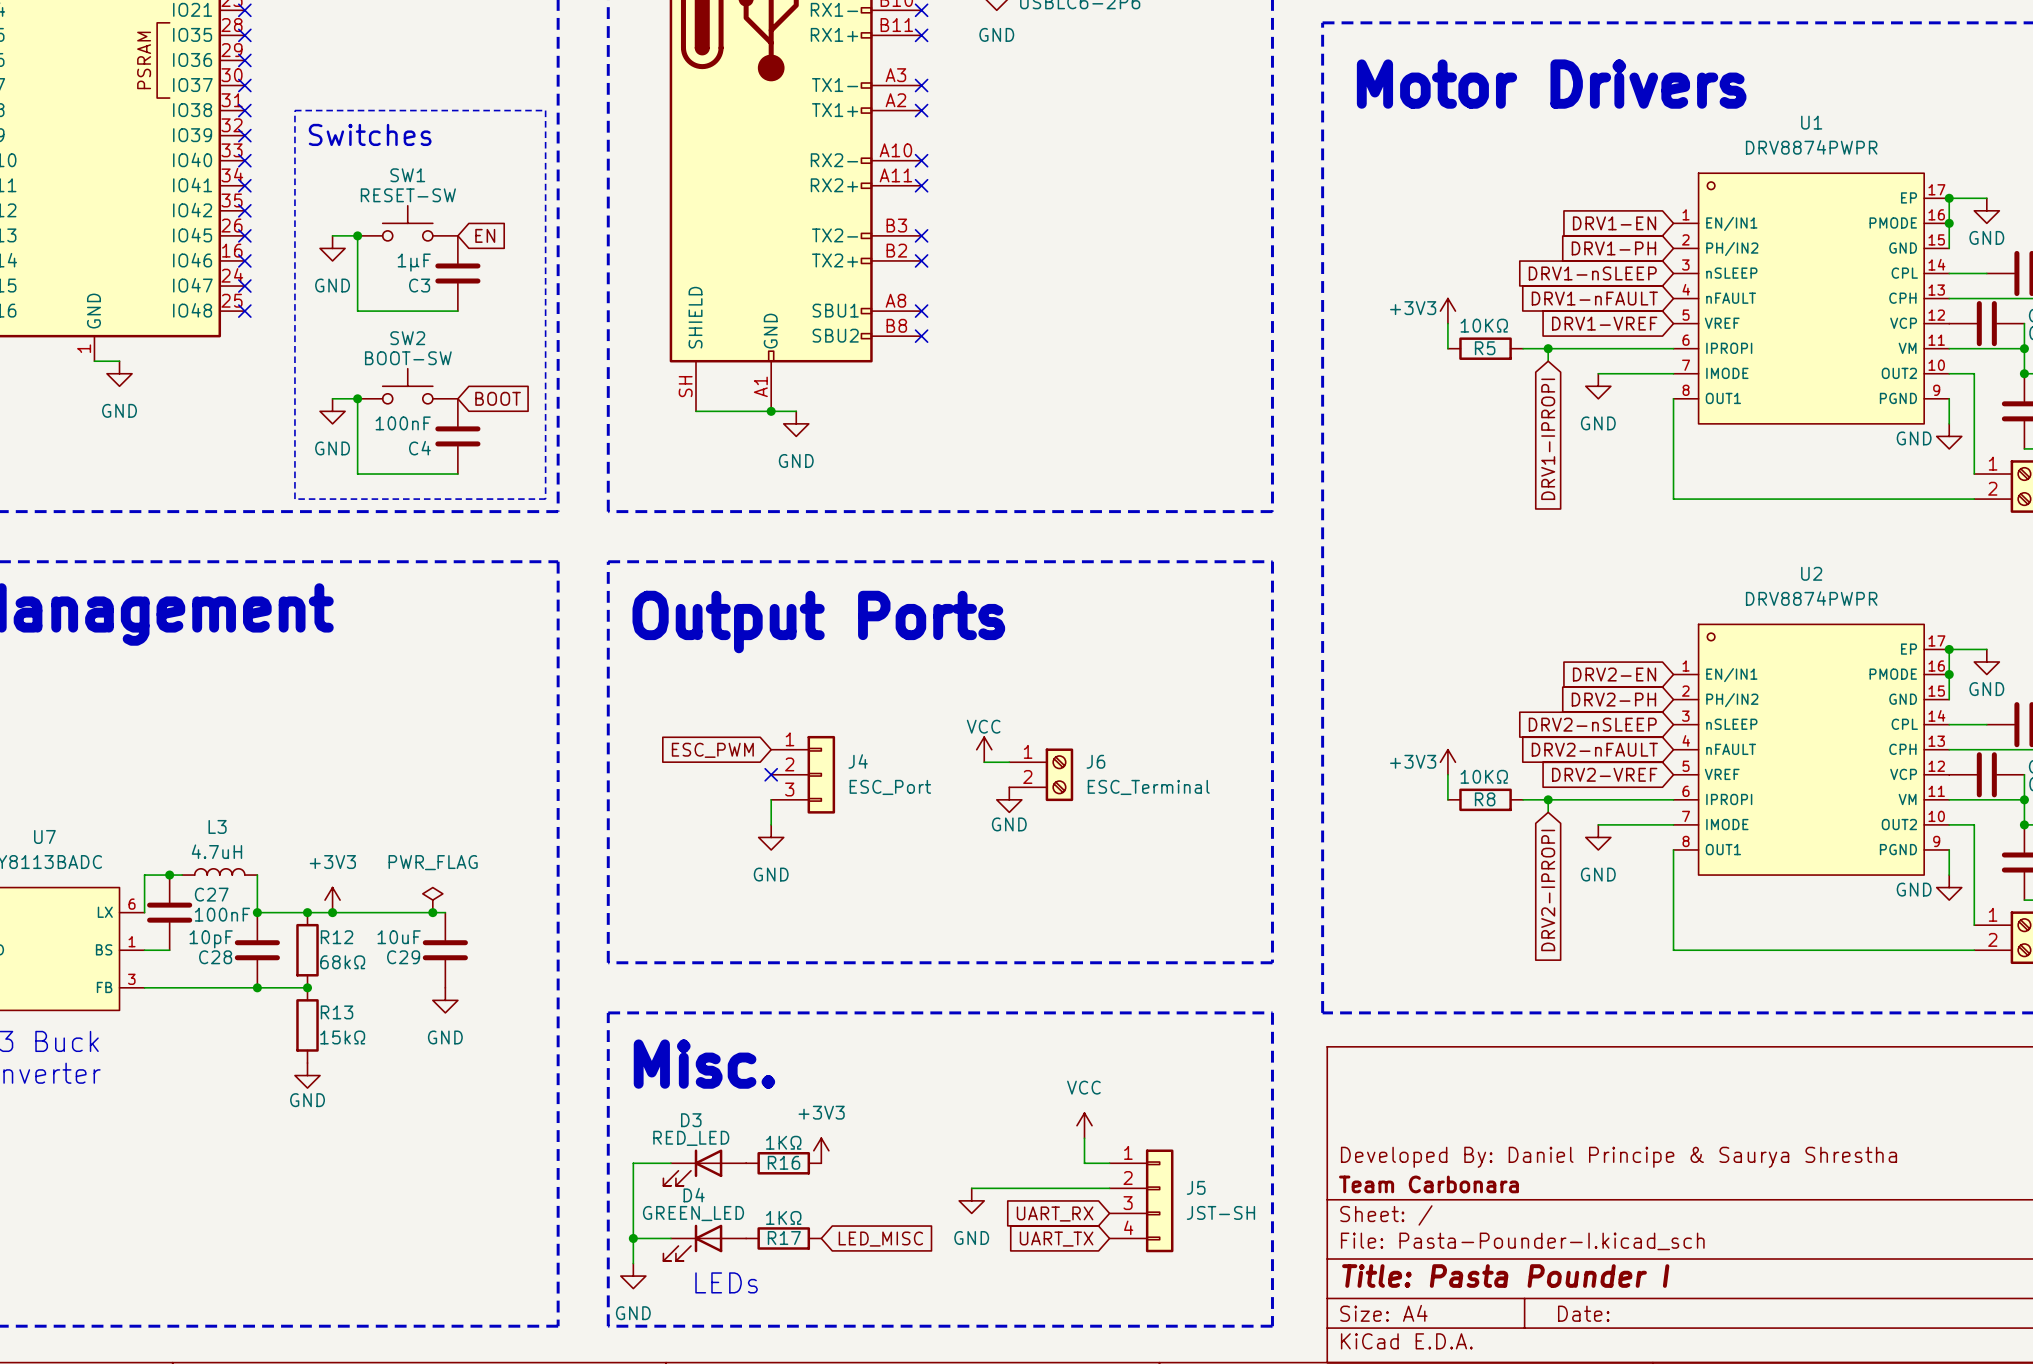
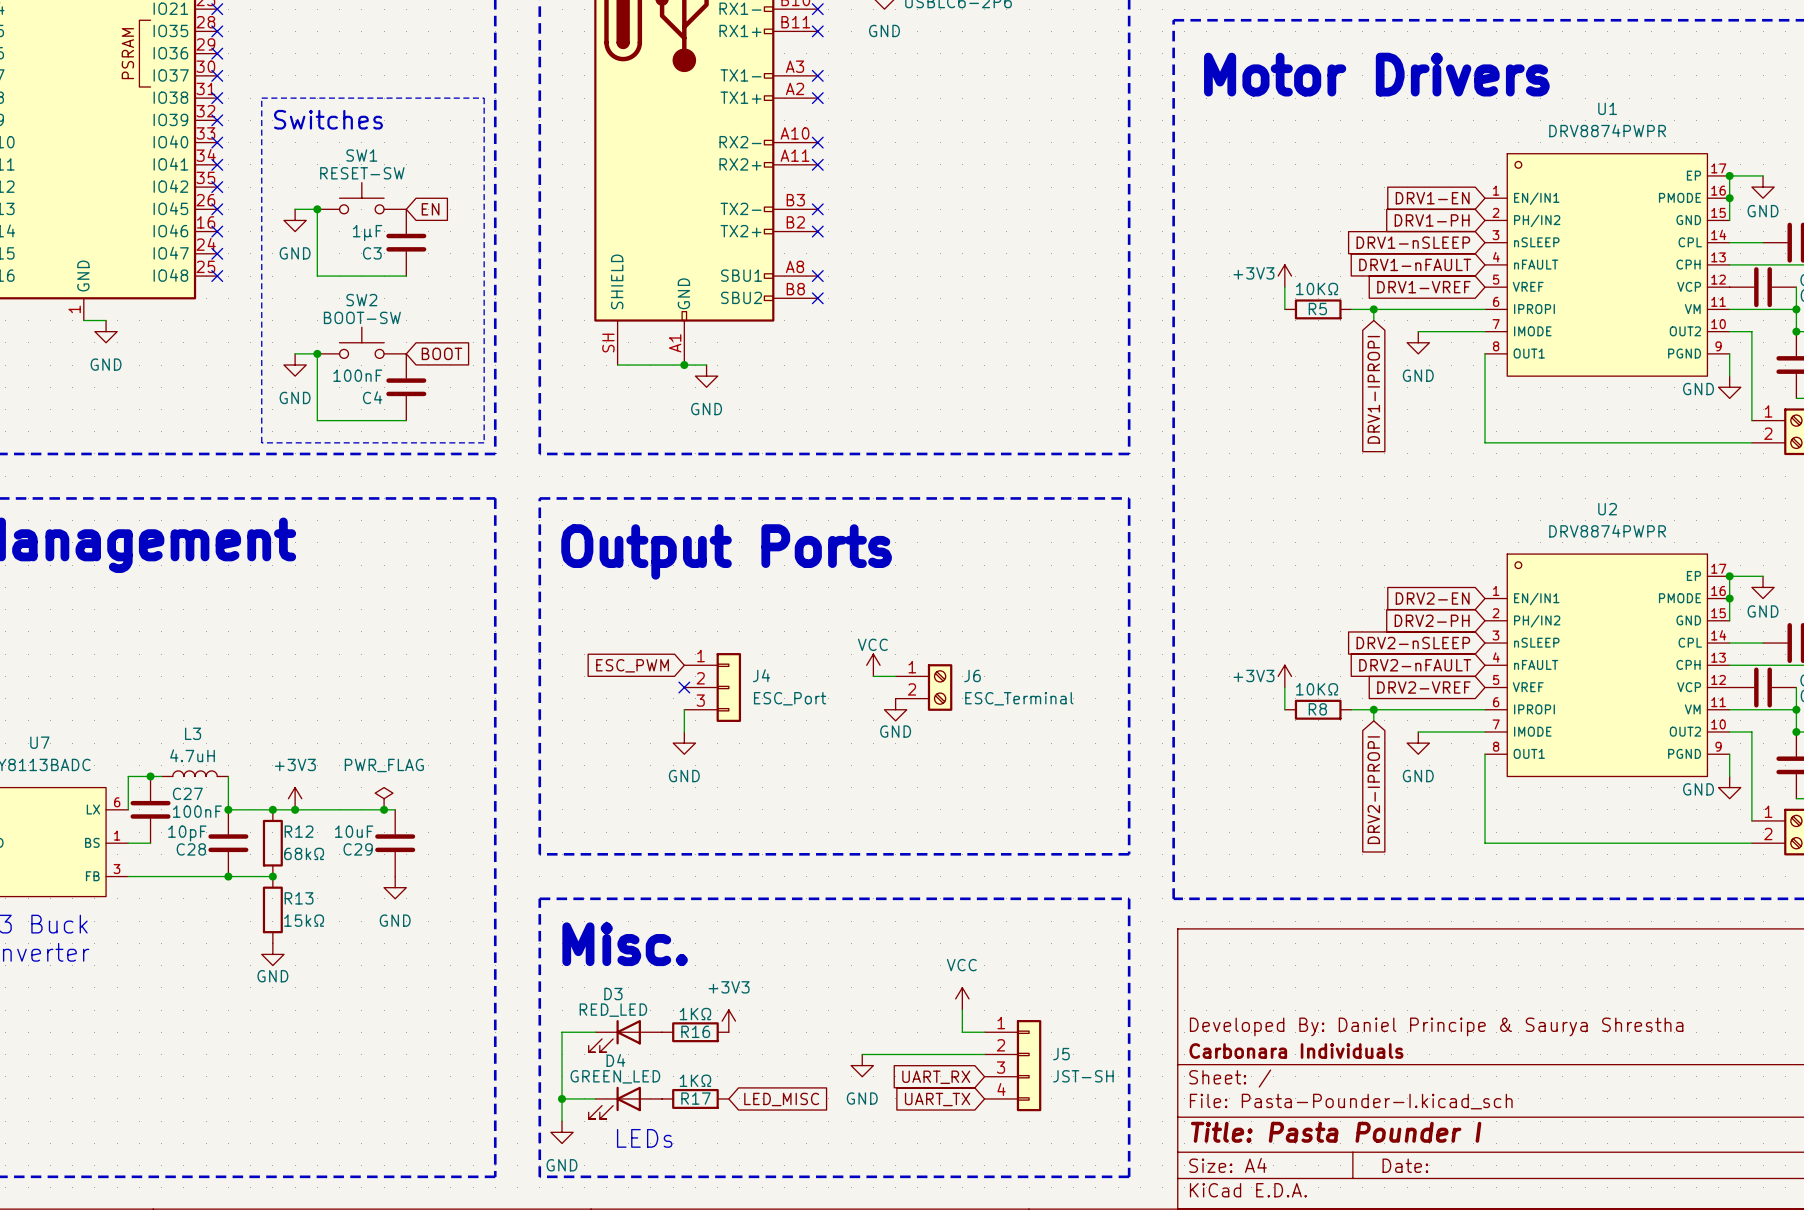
title block: Team Carbonara (1428, 1184) -> Carbonara Individuals (1296, 1051)

